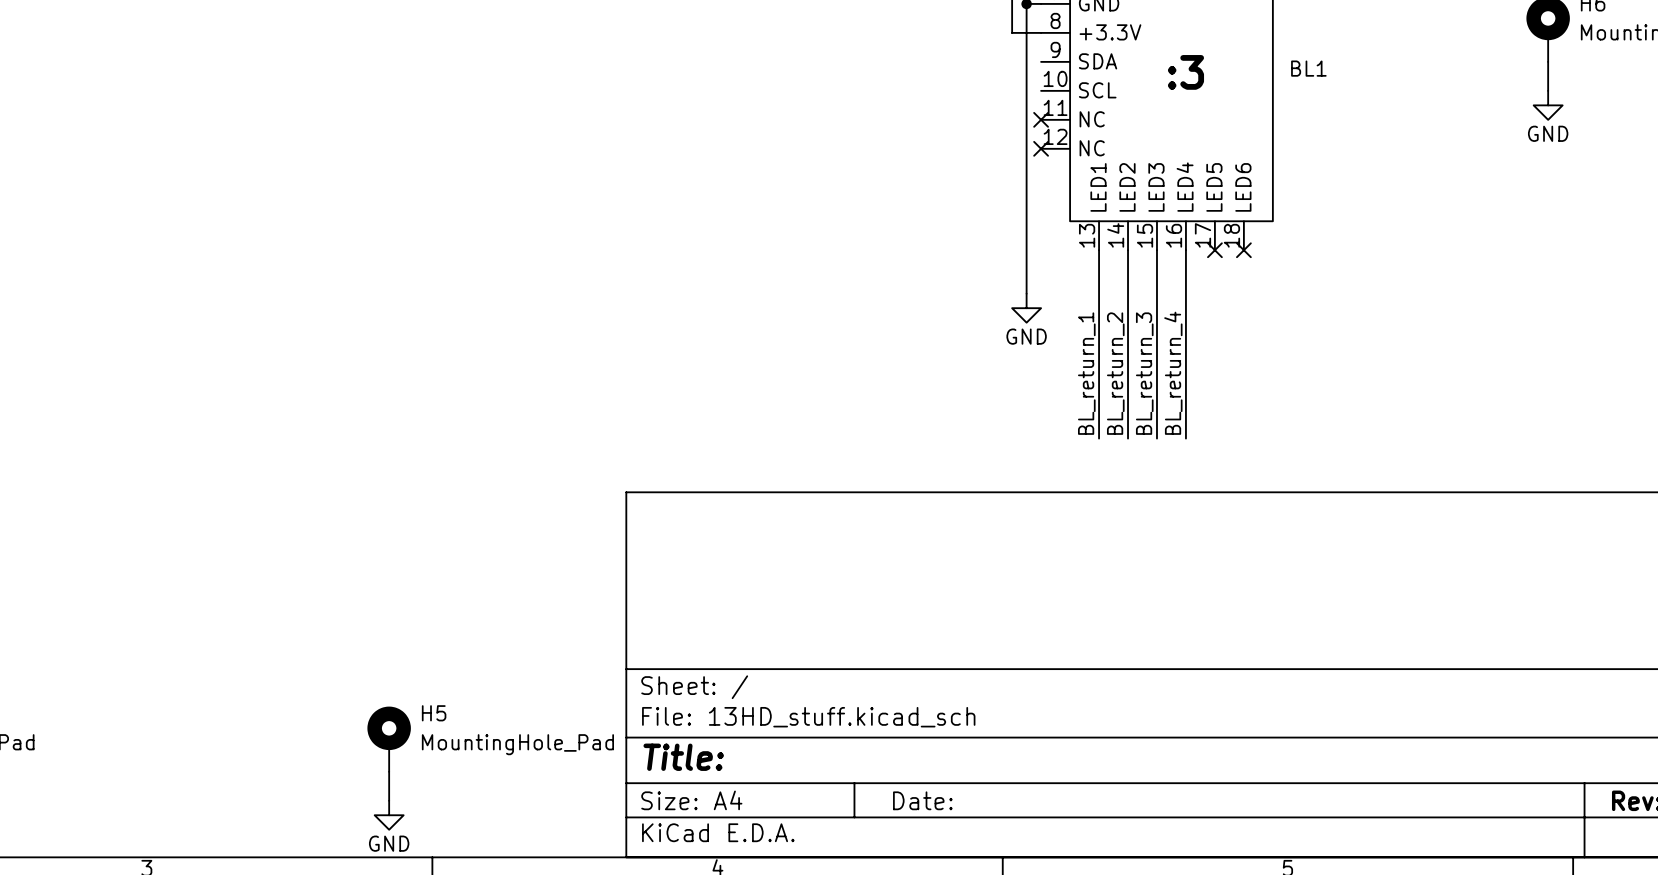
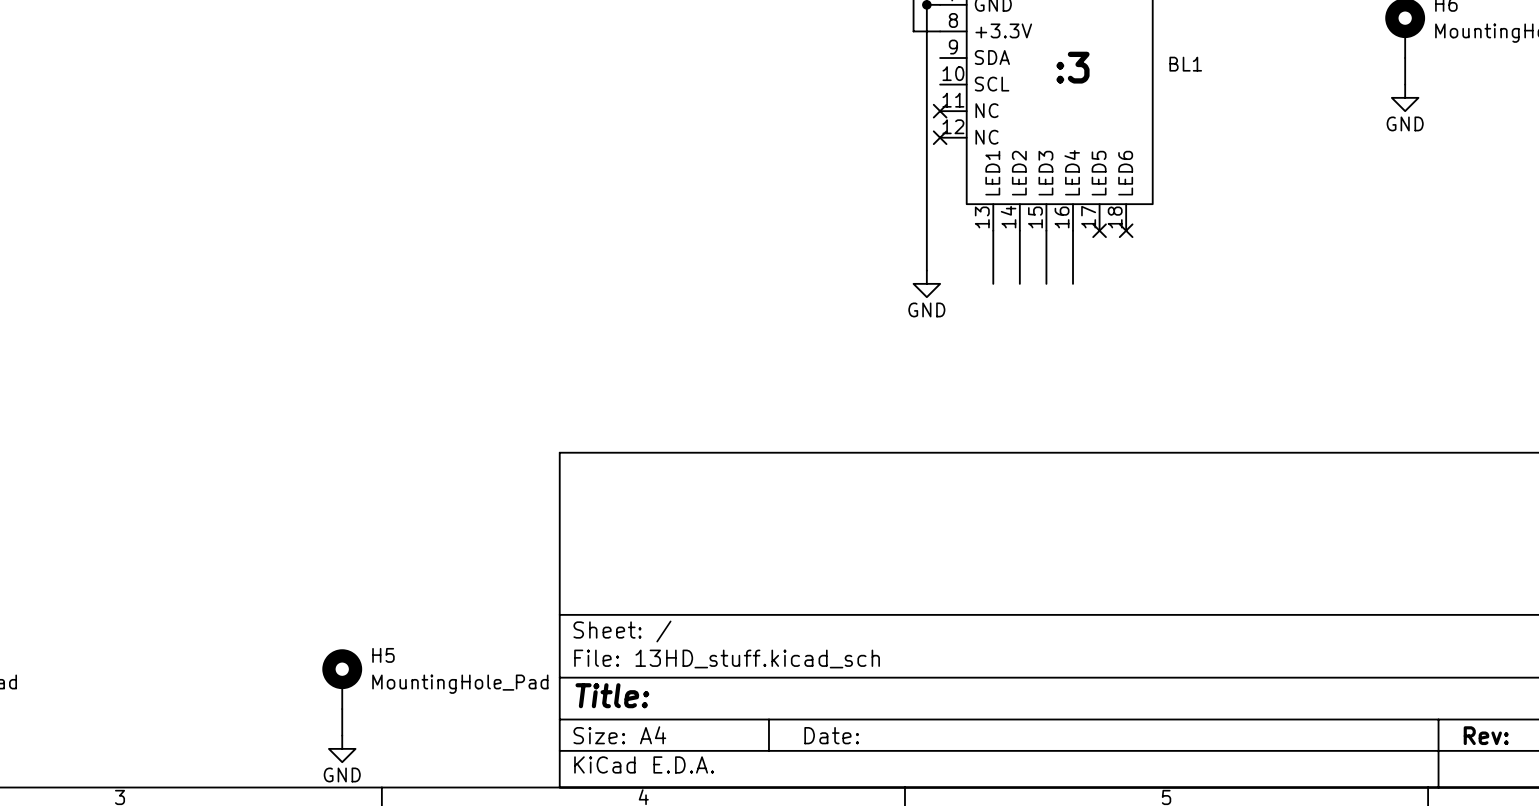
wire: (1099, 308) (1099, 438) -> none
wire: (1128, 308) (1128, 438) -> none
wire: (1156, 308) (1156, 438) -> none
wire: (1185, 308) (1185, 438) -> none
label: BL_return_1 (1086, 373) -> none
label: BL_return_2 (1115, 373) -> none
label: BL_return_3 (1144, 373) -> none
label: BL_return_4 (1173, 373) -> none

